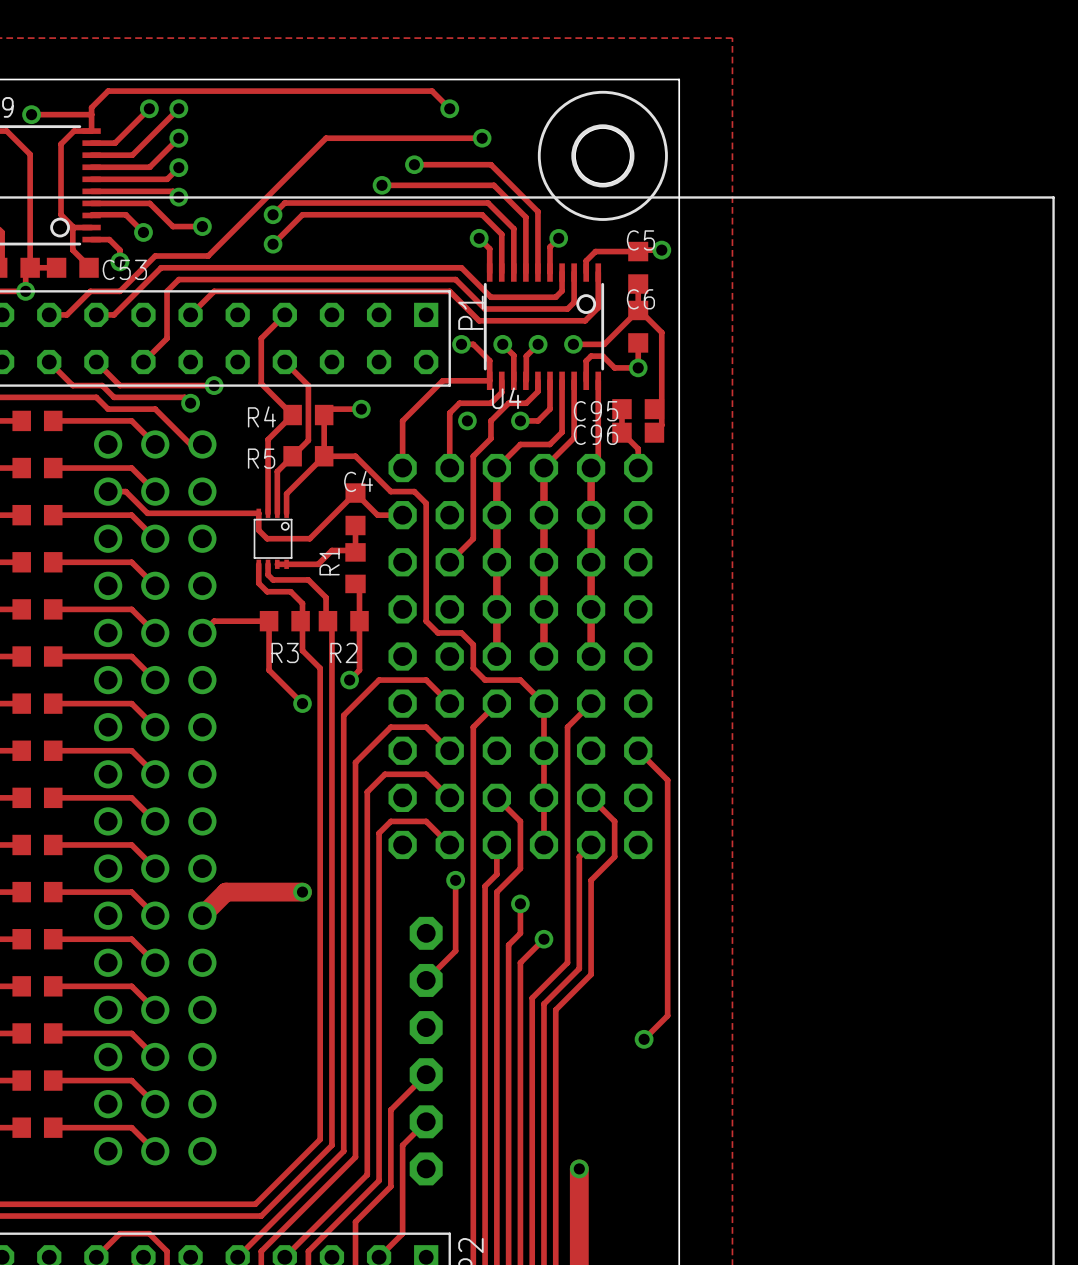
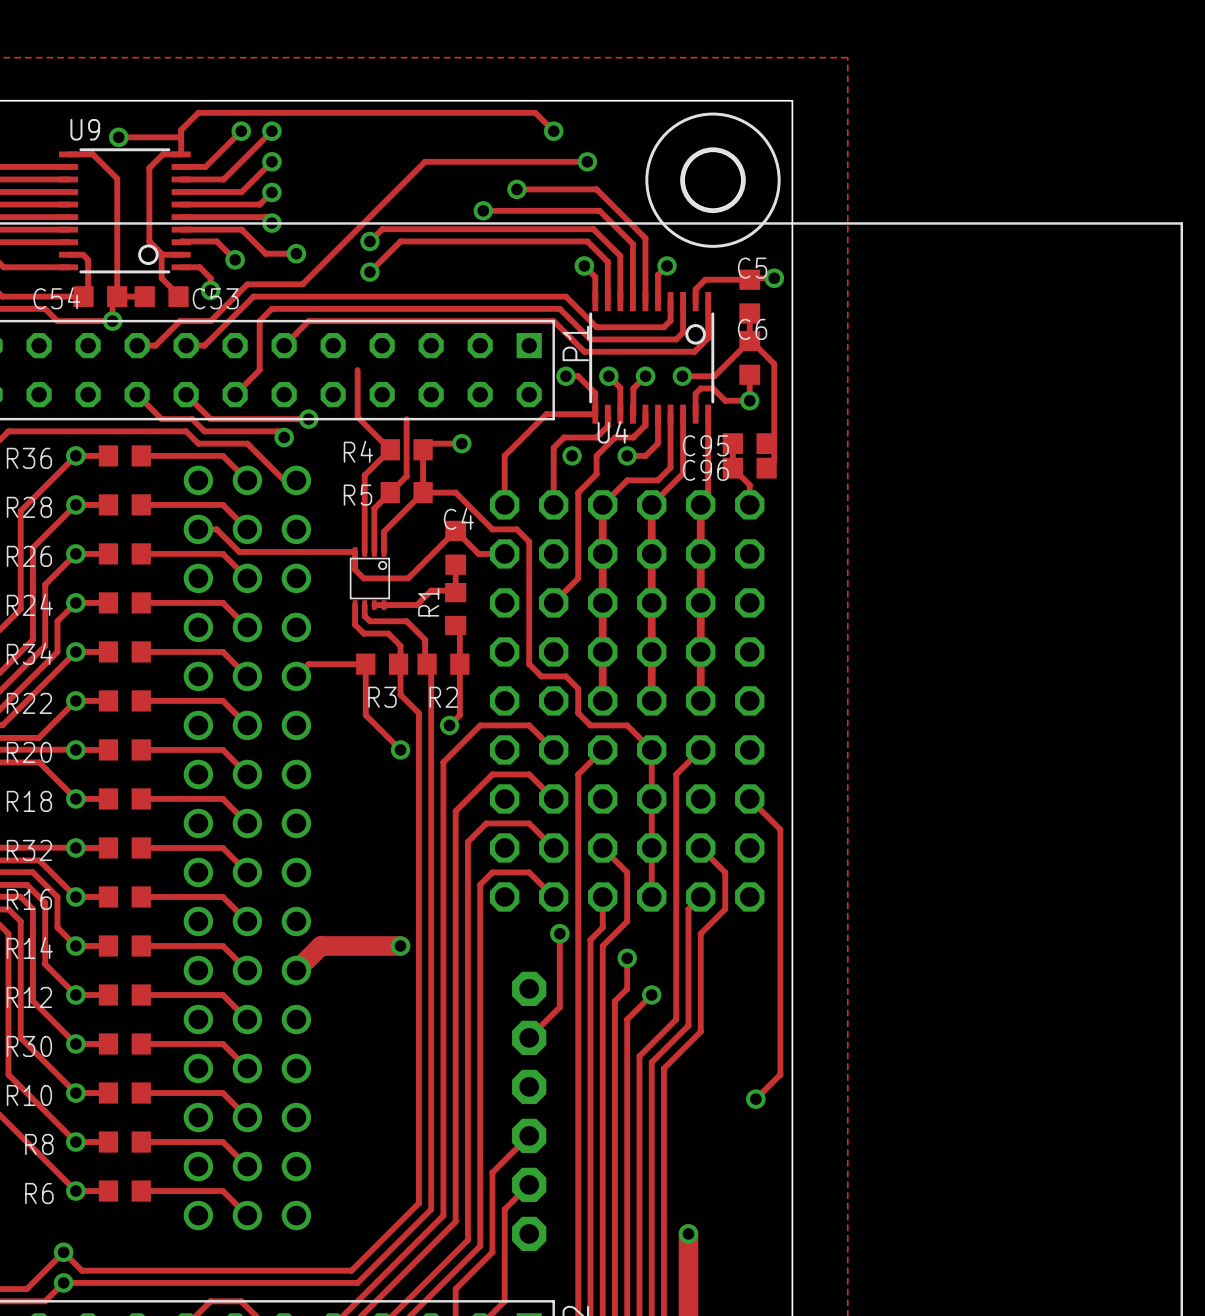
track: (284, 314) (261, 338) -> none
track: (284, 362) (308, 385) -> none

